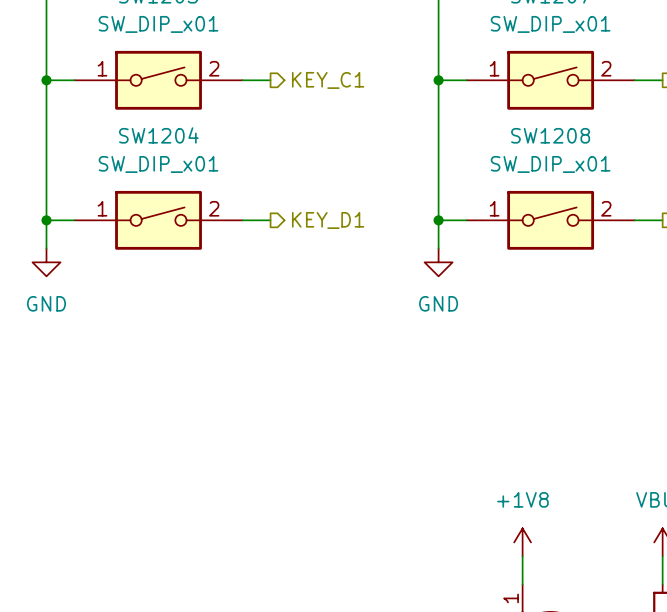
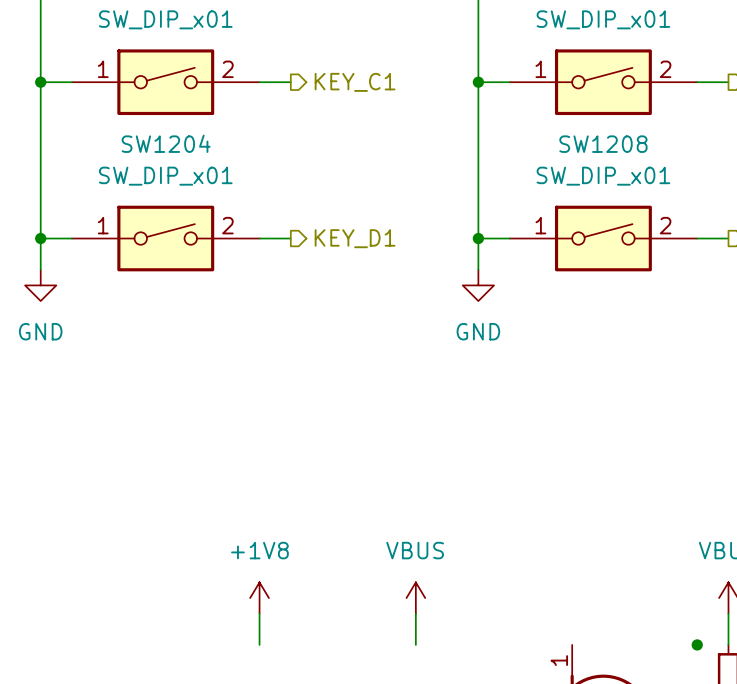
power symbol: none -> +1V8 (259, 598)
power symbol: none -> VBUS (415, 598)
power symbol: +1V8 (522, 542) -> none
wire: none -> (259, 613) (259, 644)
wire: (522, 556) (522, 584) -> (415, 613) (415, 644)
junction: none -> (697, 644)

